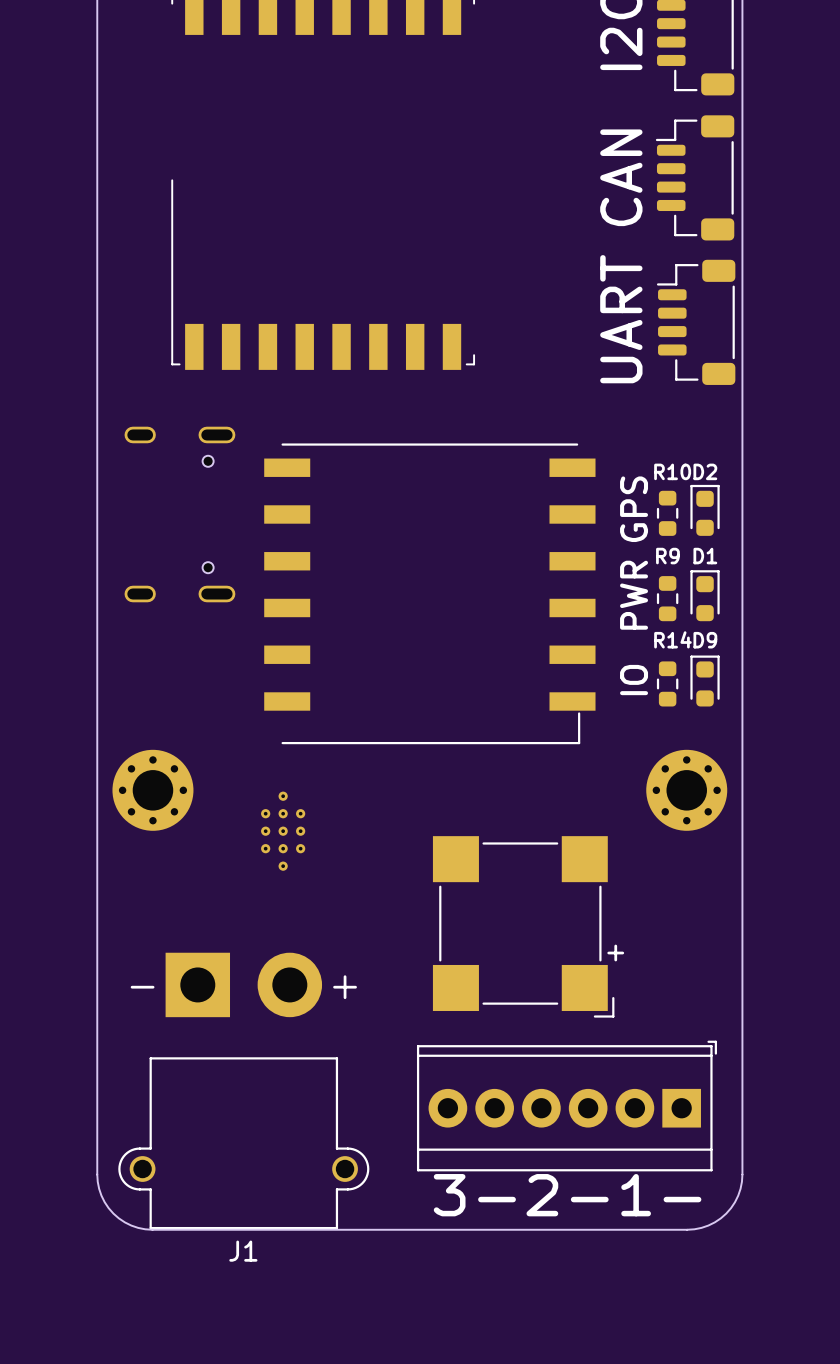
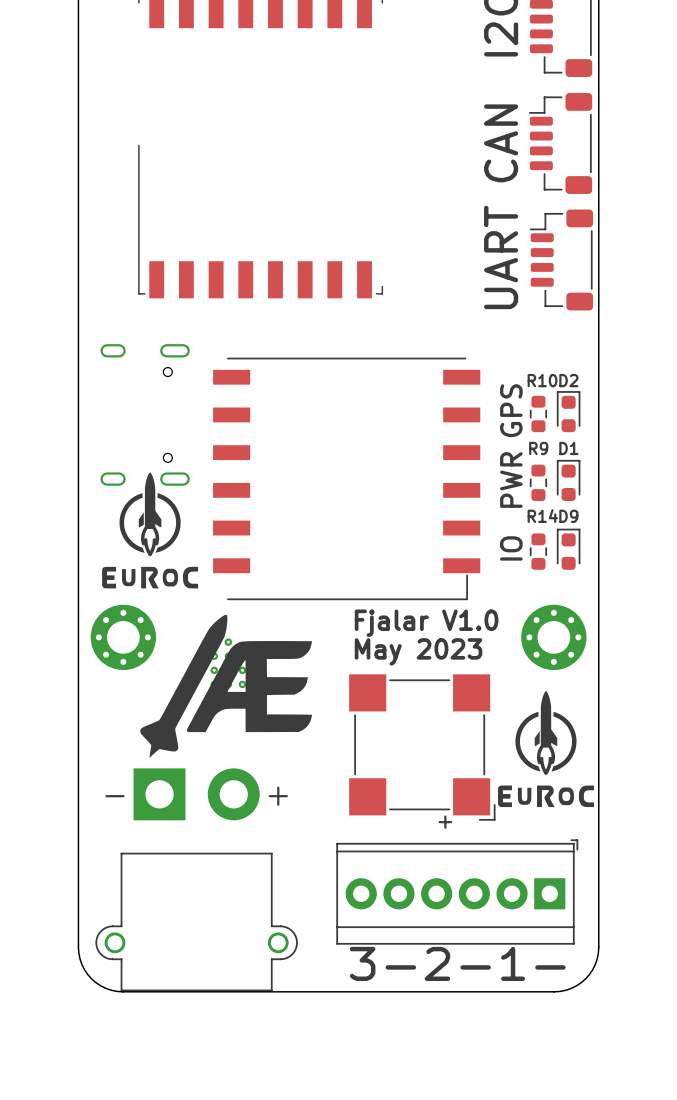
drawing: none -> [102, 472, 199, 589]
drawing: none -> [140, 614, 313, 758]
text: none -> Fjalar V1.0 (426, 623)
text: none -> May 2023 (418, 651)
drawing: none -> [498, 691, 594, 808]
part text position: + (615, 953) -> + (445, 822)
J1 name: J1 (243, 1251) -> none

